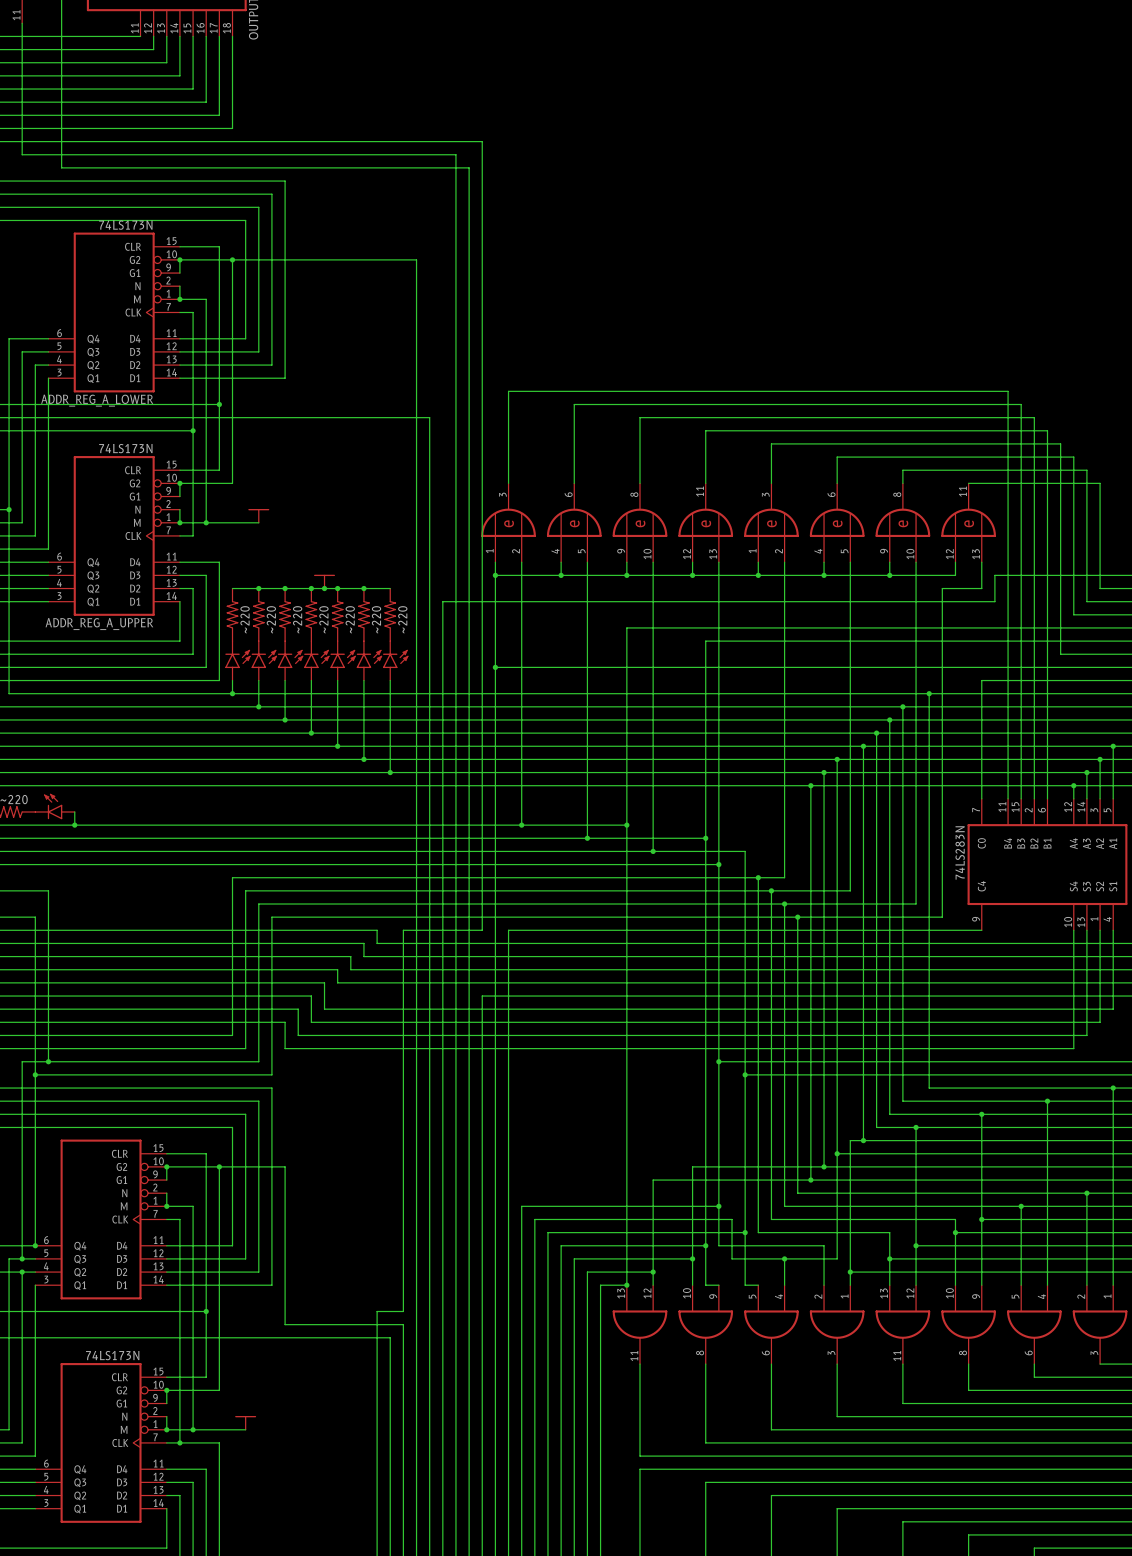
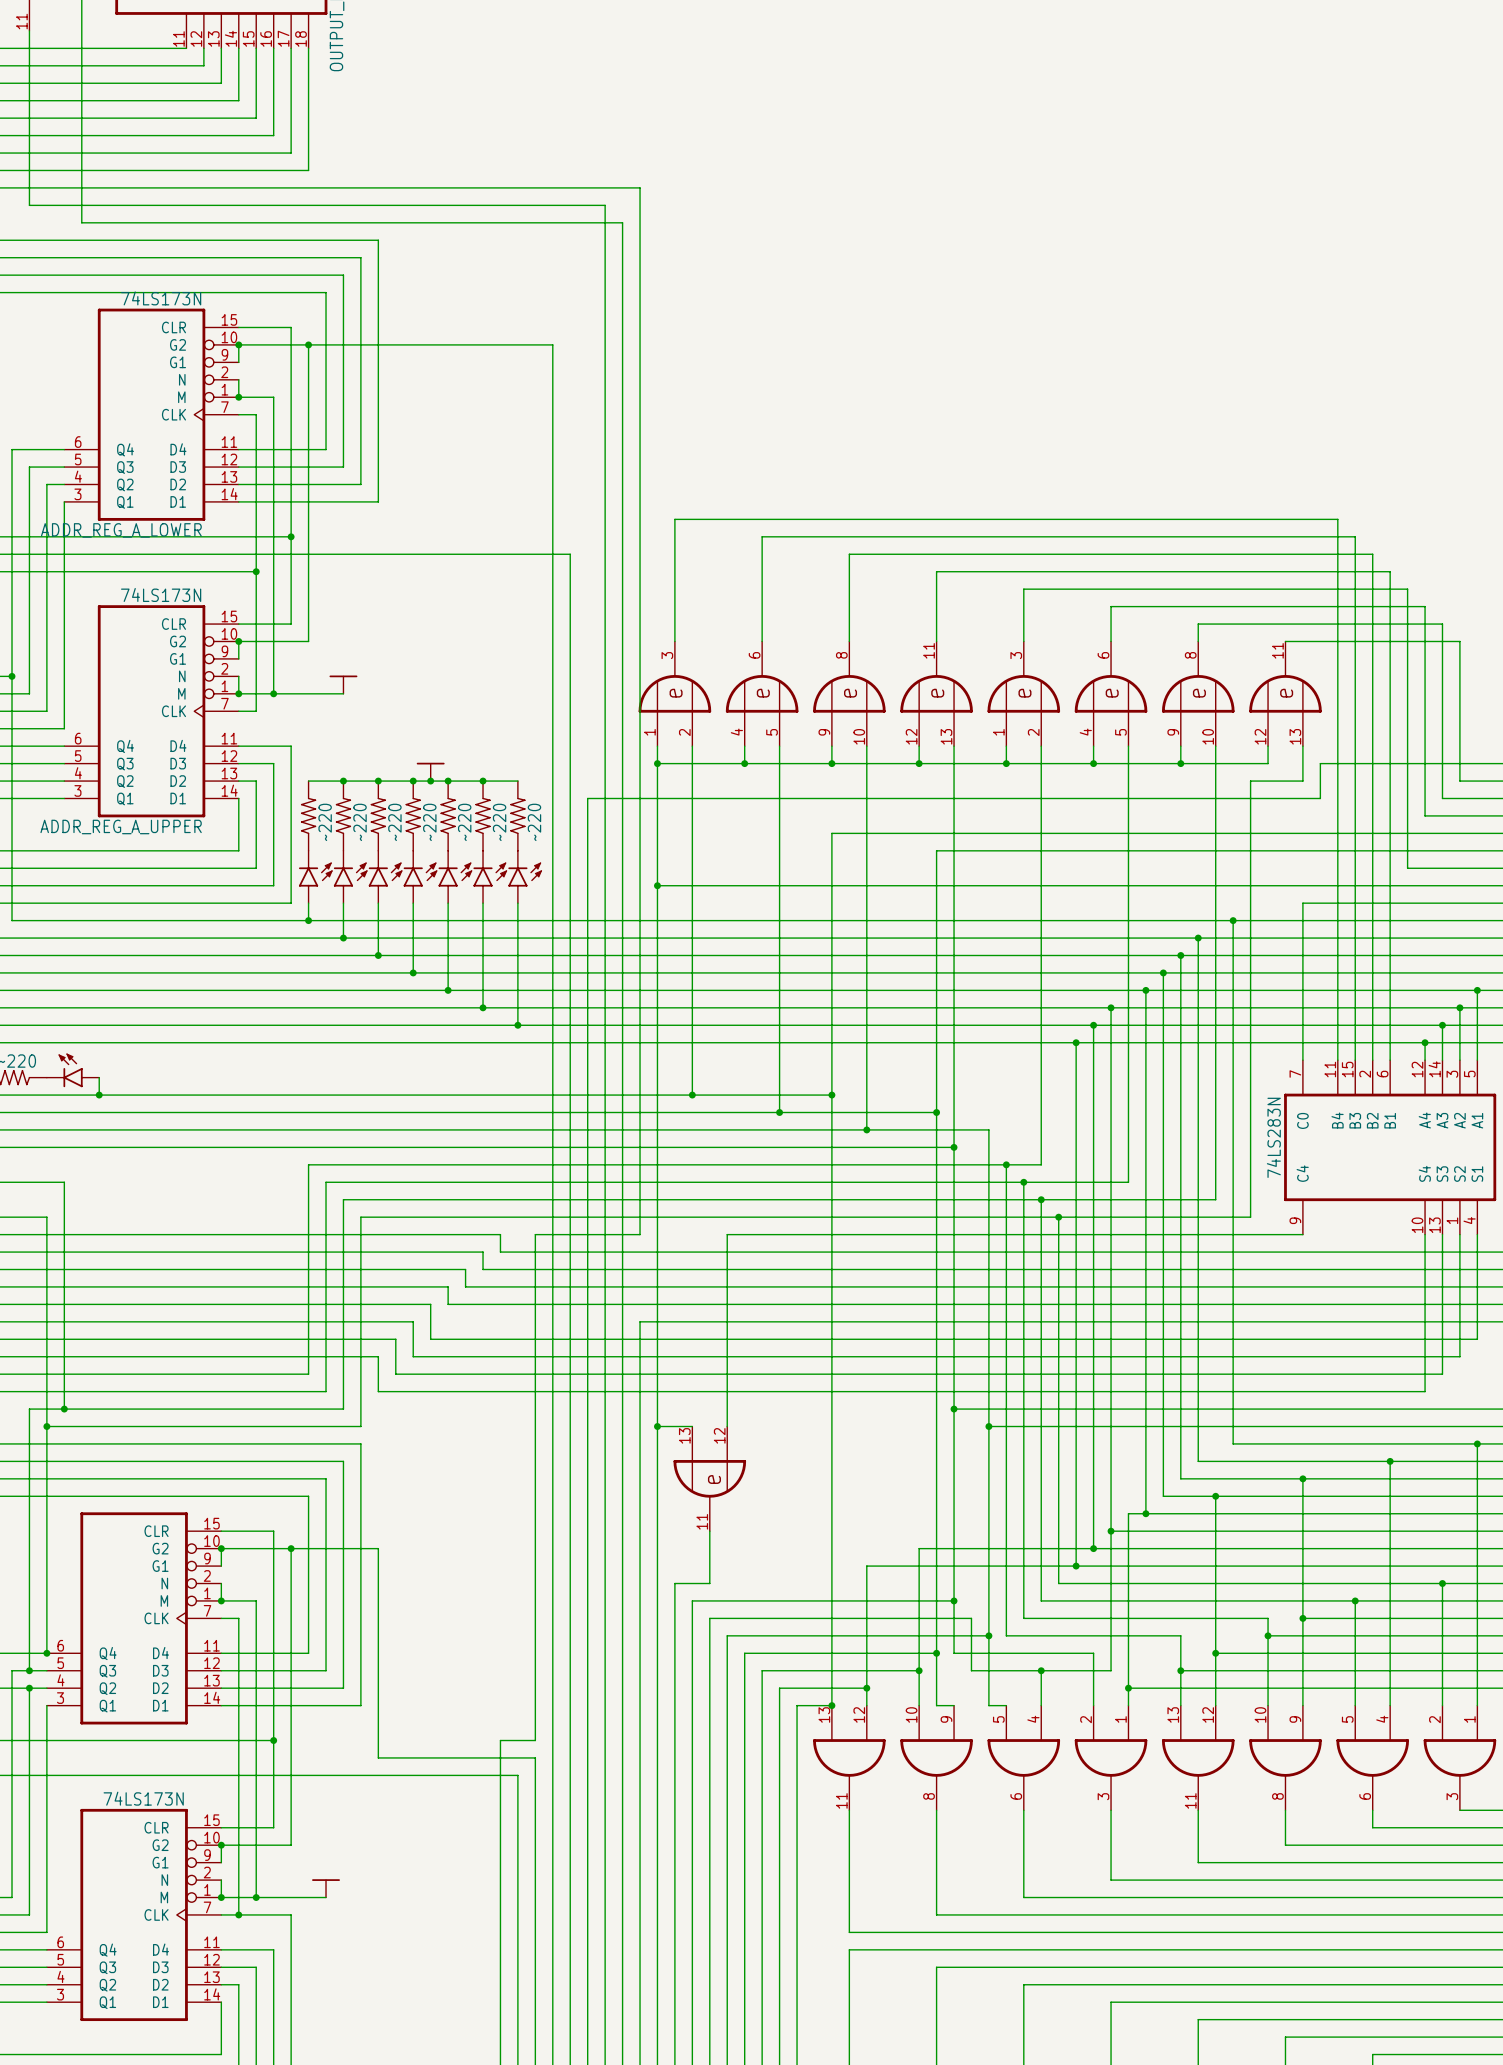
wire: (547, 930) (508, 930) (508, 1193) -> (727, 1234) (727, 1426)
wire: none -> (657, 1426) (692, 1426)
junction: none -> (657, 1426)
part: none -> (709, 1478)
wire: none -> (709, 1531) (709, 1583) (674, 1583)

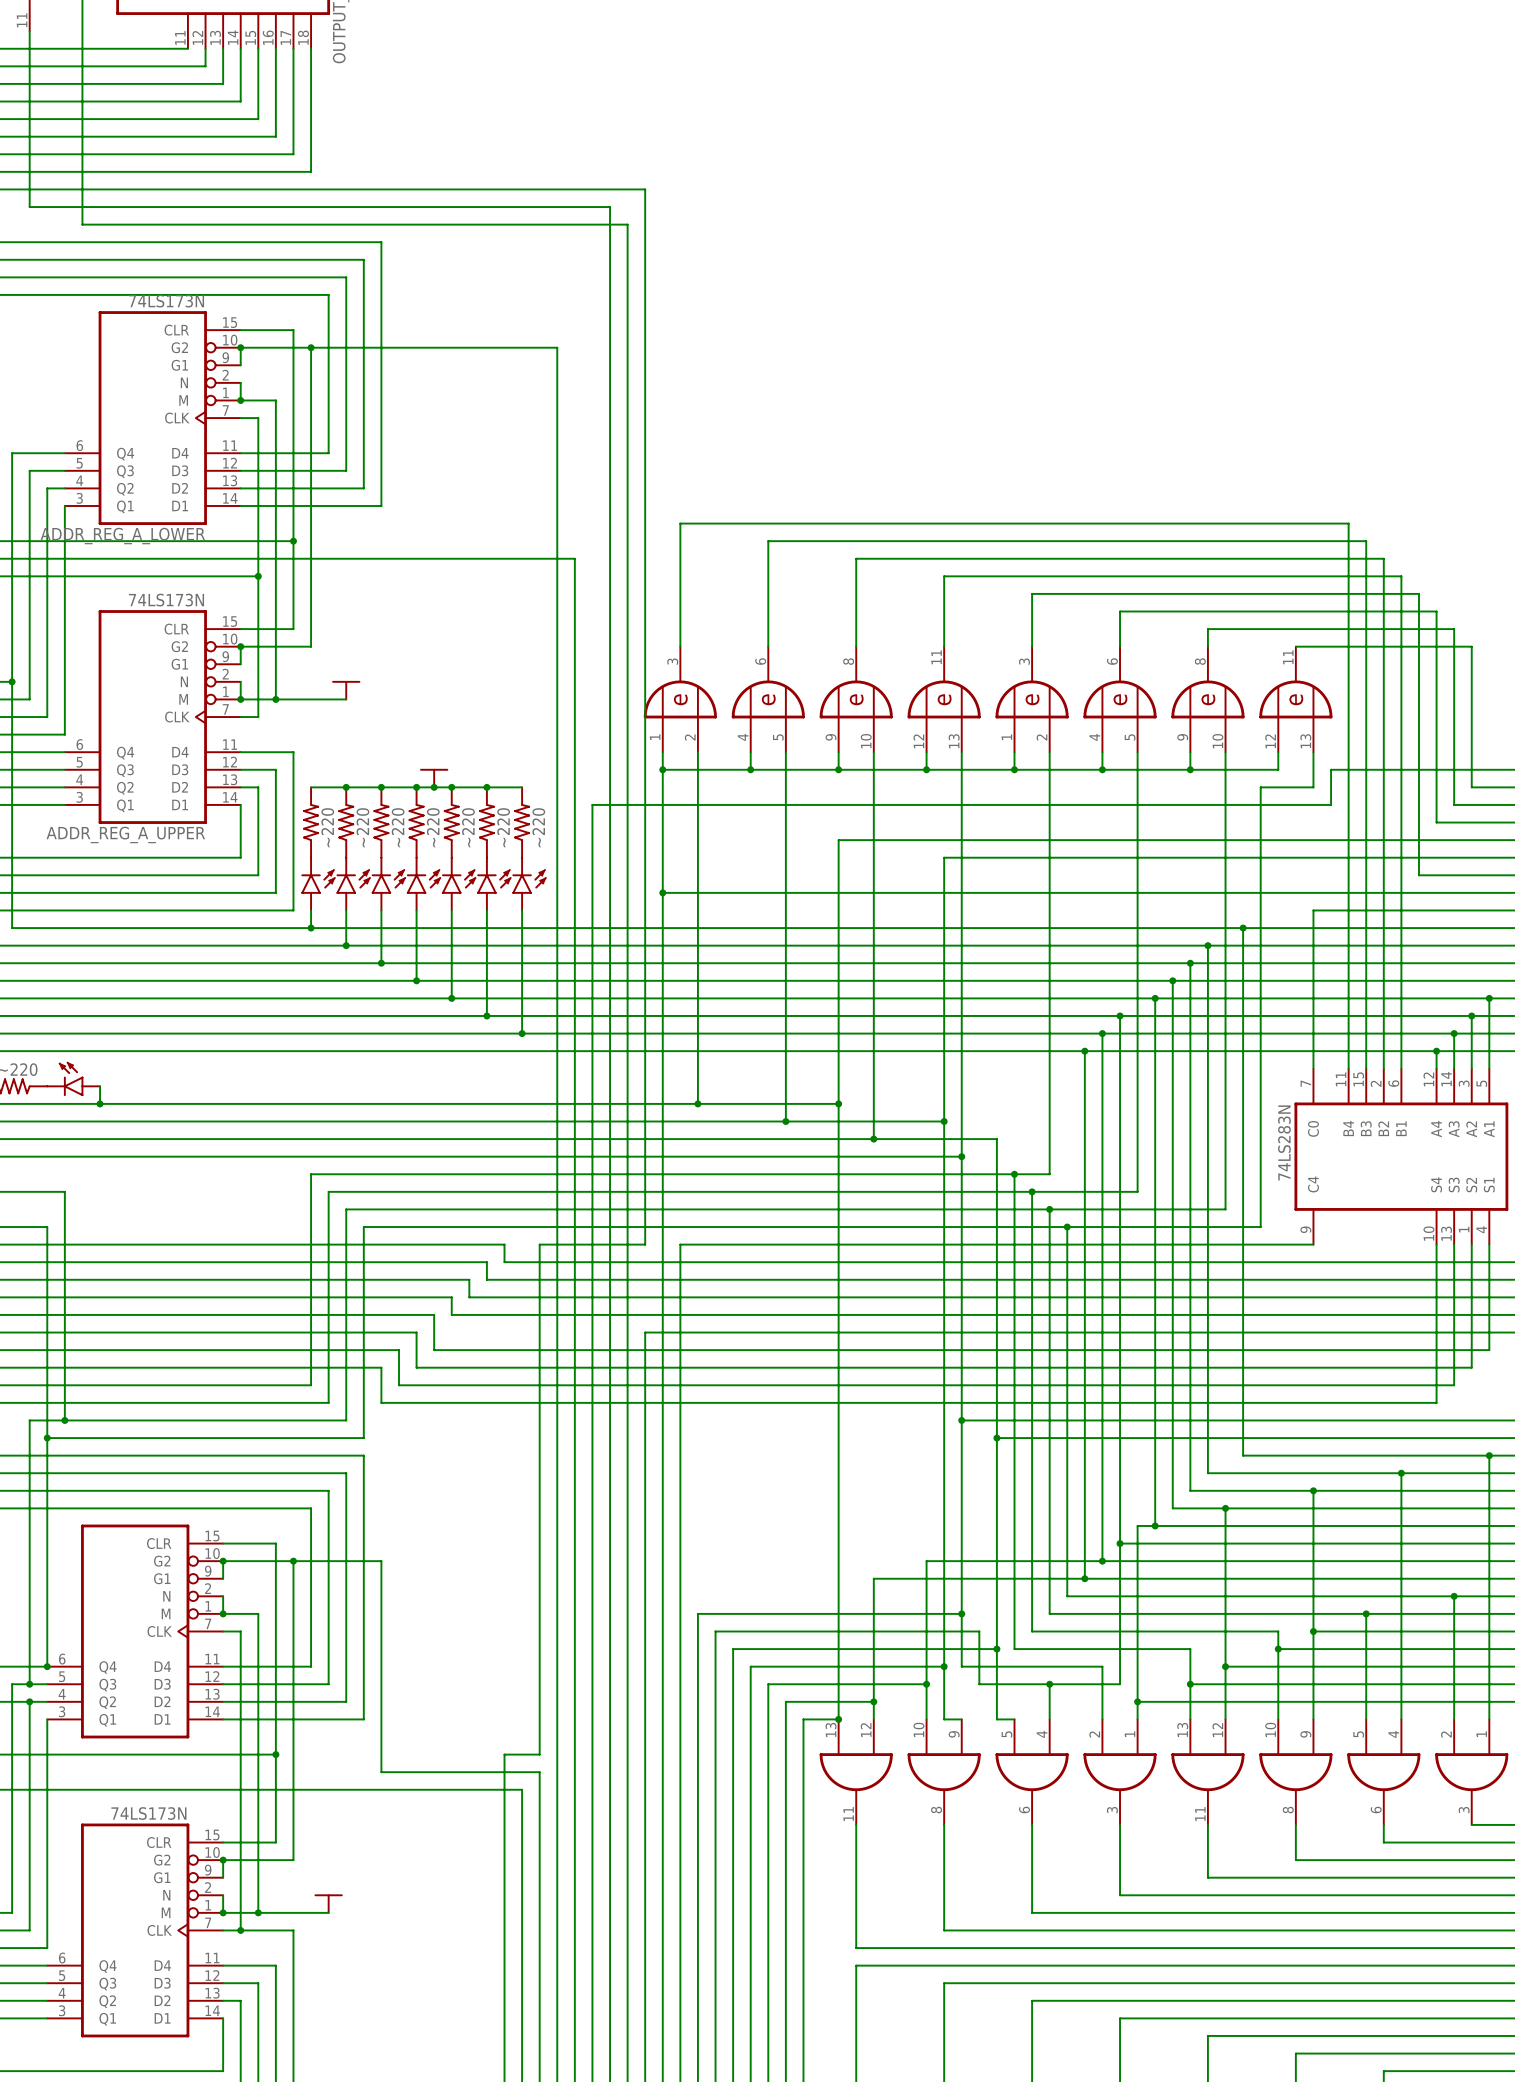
wire: (727, 1234) (727, 1426) -> (733, 1244) (680, 1244) (680, 1596)
wire: (657, 1426) (692, 1426) -> none
junction: (657, 1426) -> none
part: (709, 1478) -> none
wire: (709, 1531) (709, 1583) (674, 1583) -> none

